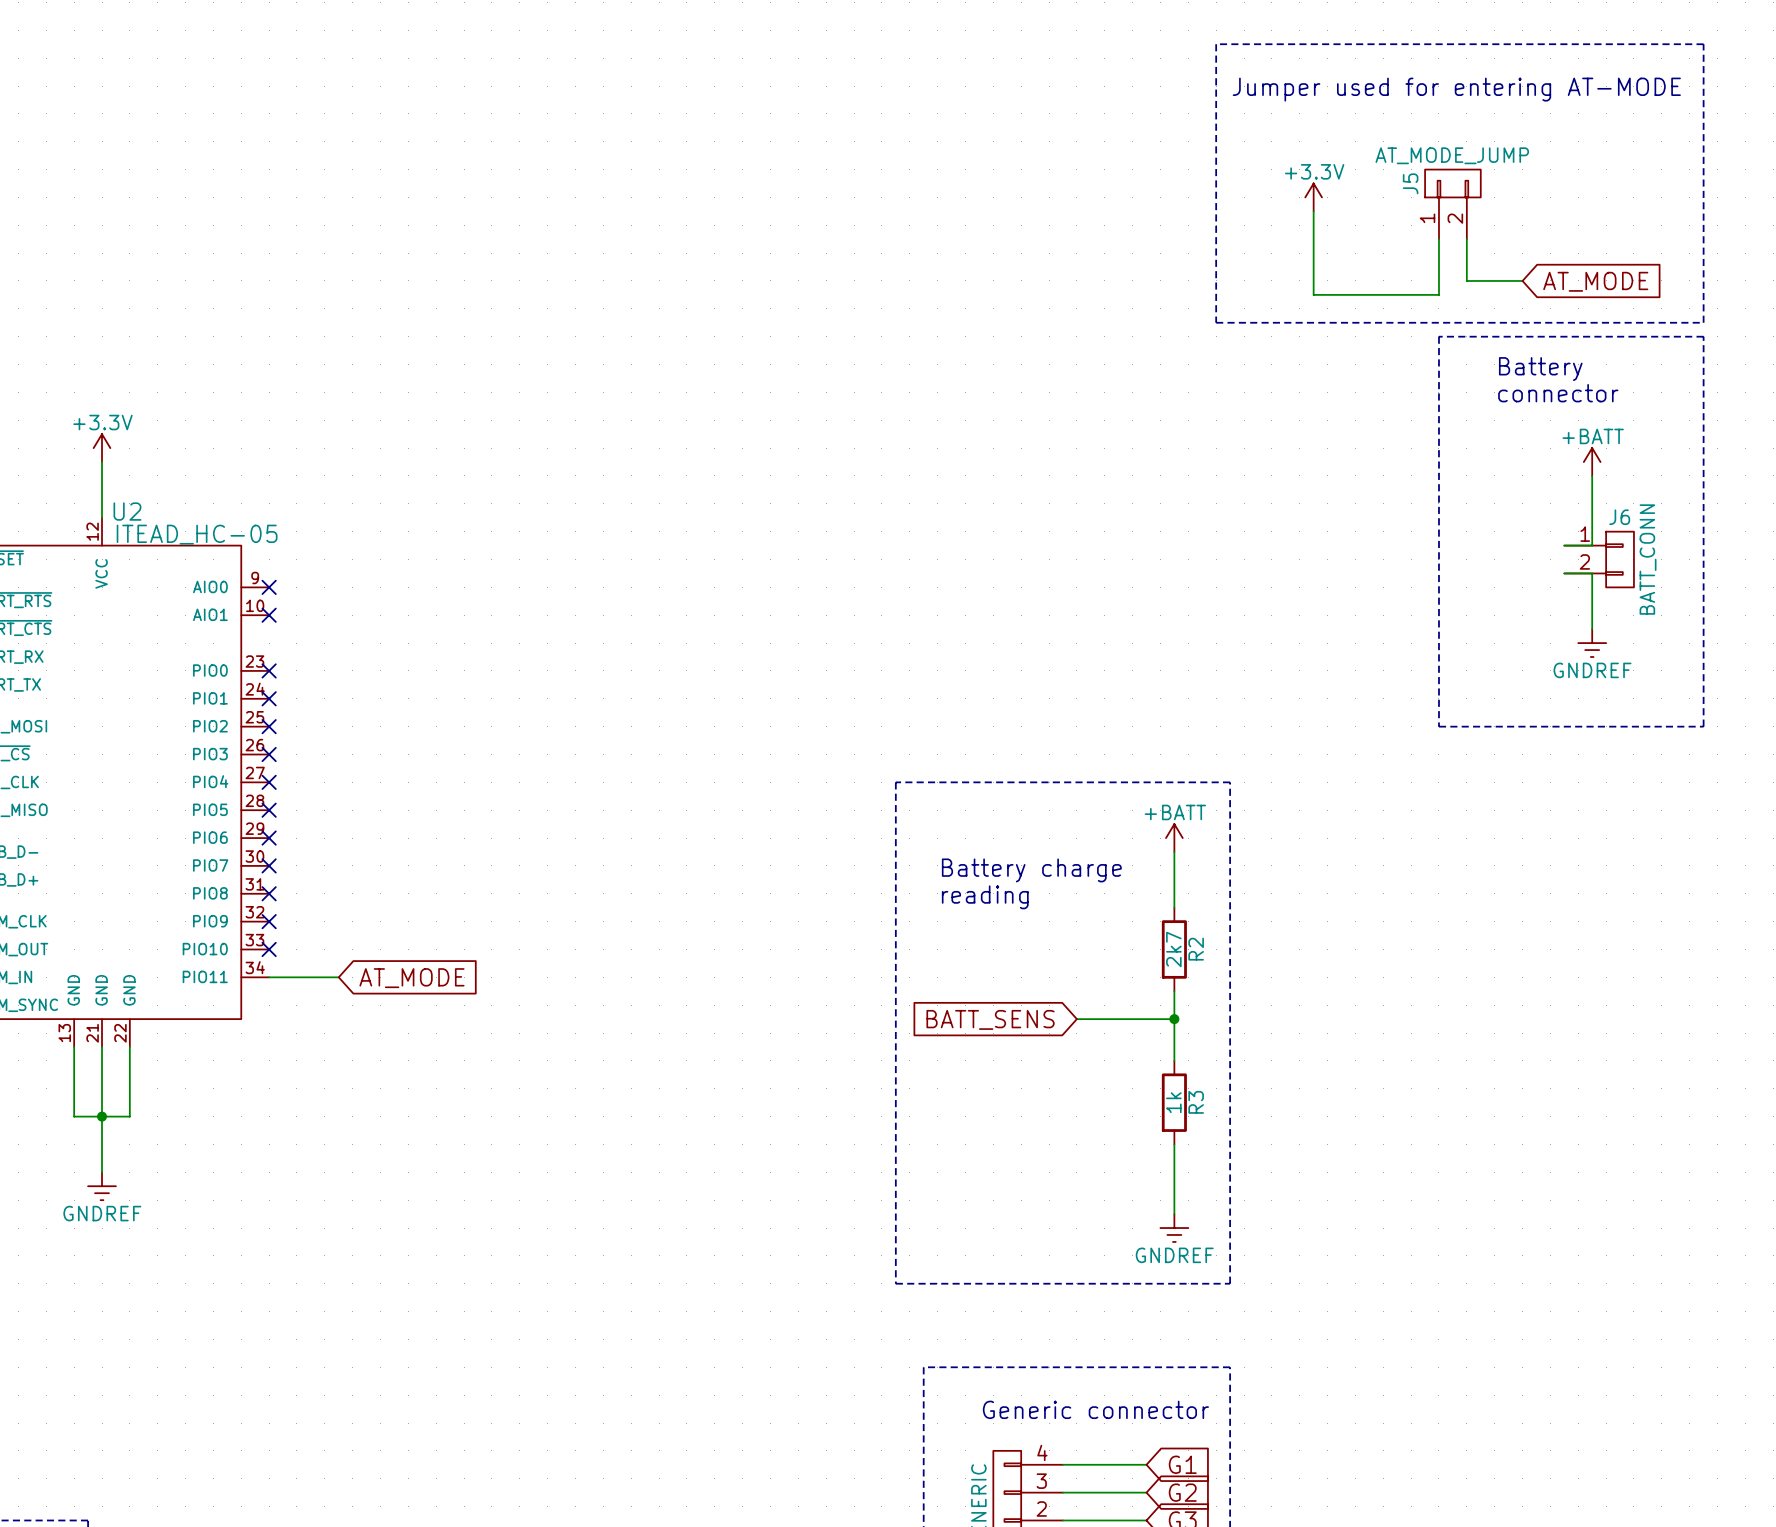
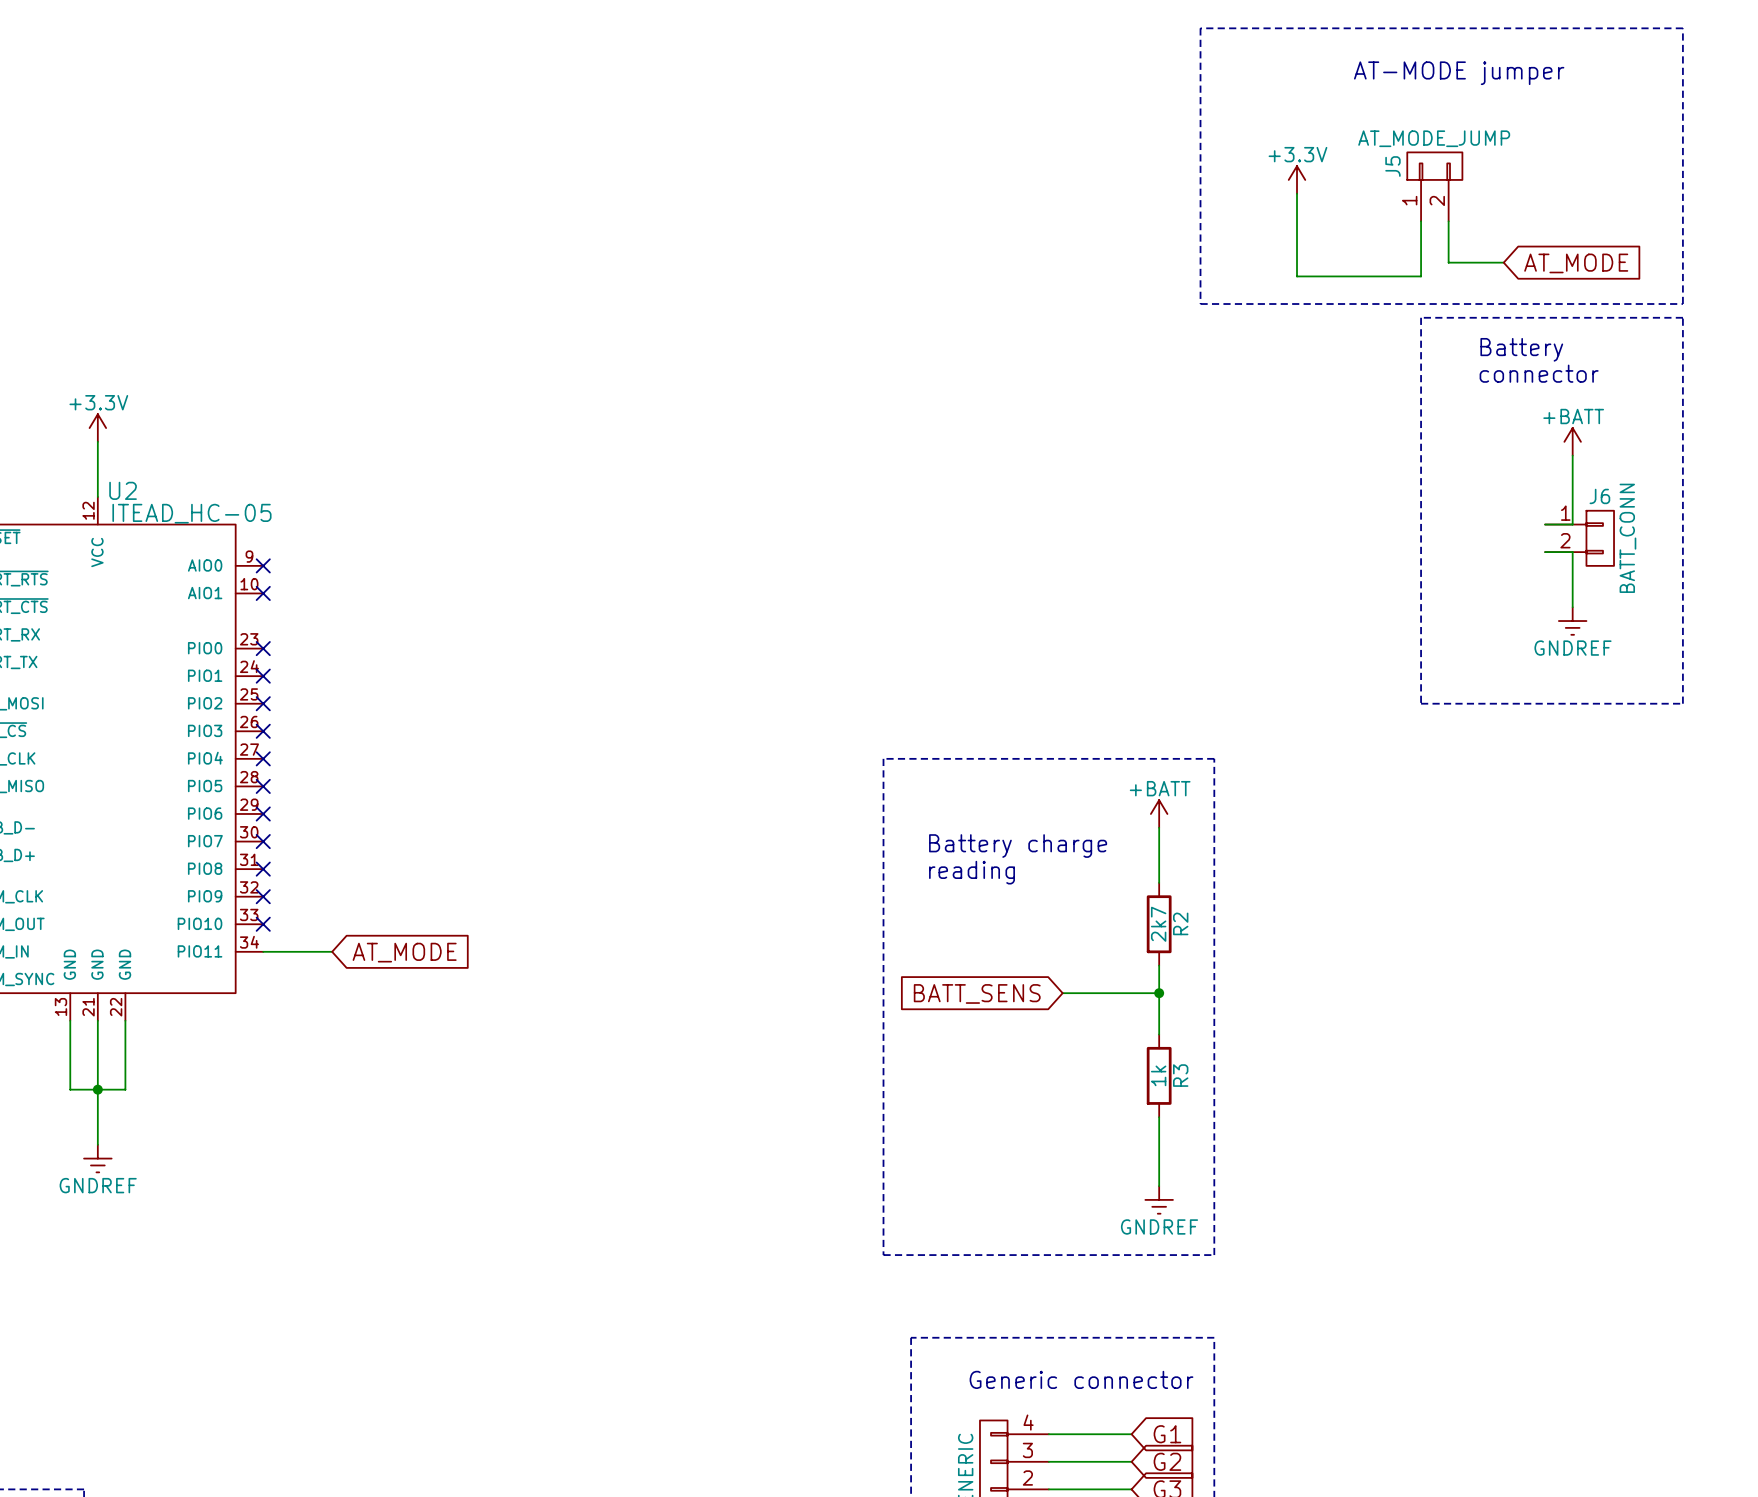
text: Jumper used for entering AT-MODE (1456, 89) -> none
text: none -> AT-MODE jumper (1459, 73)

